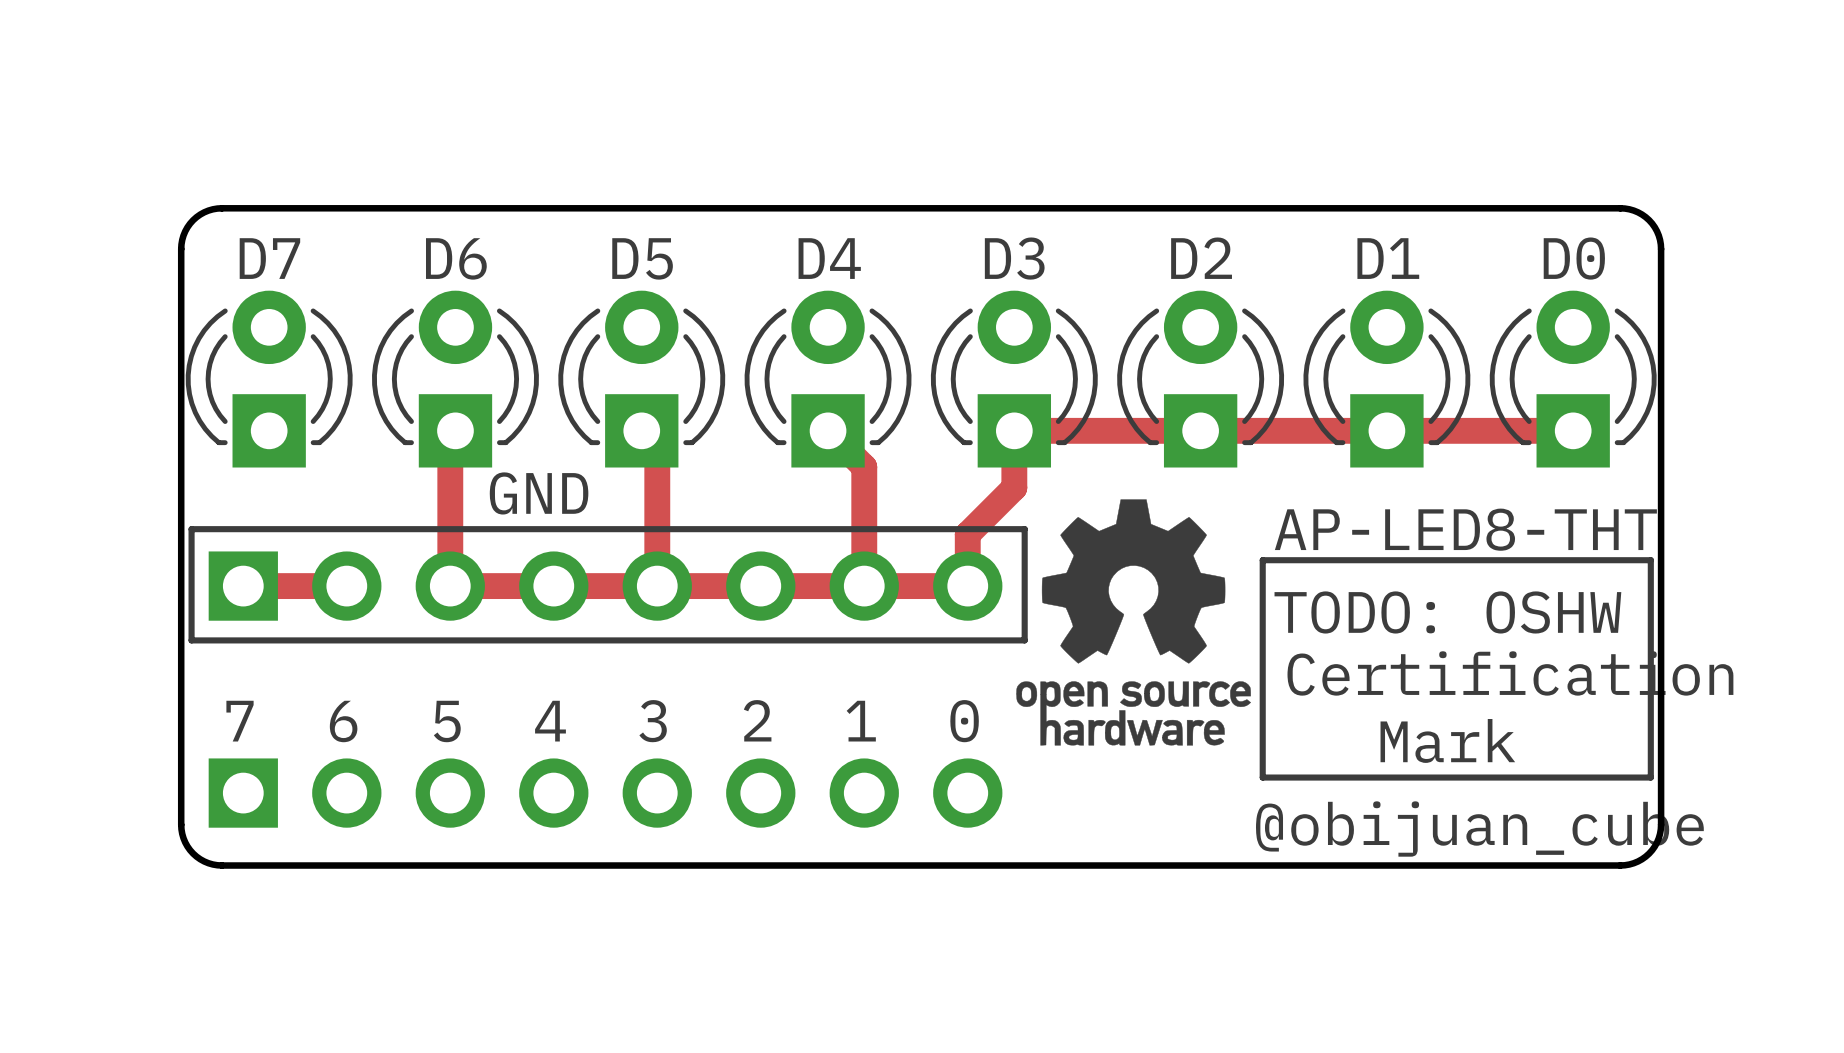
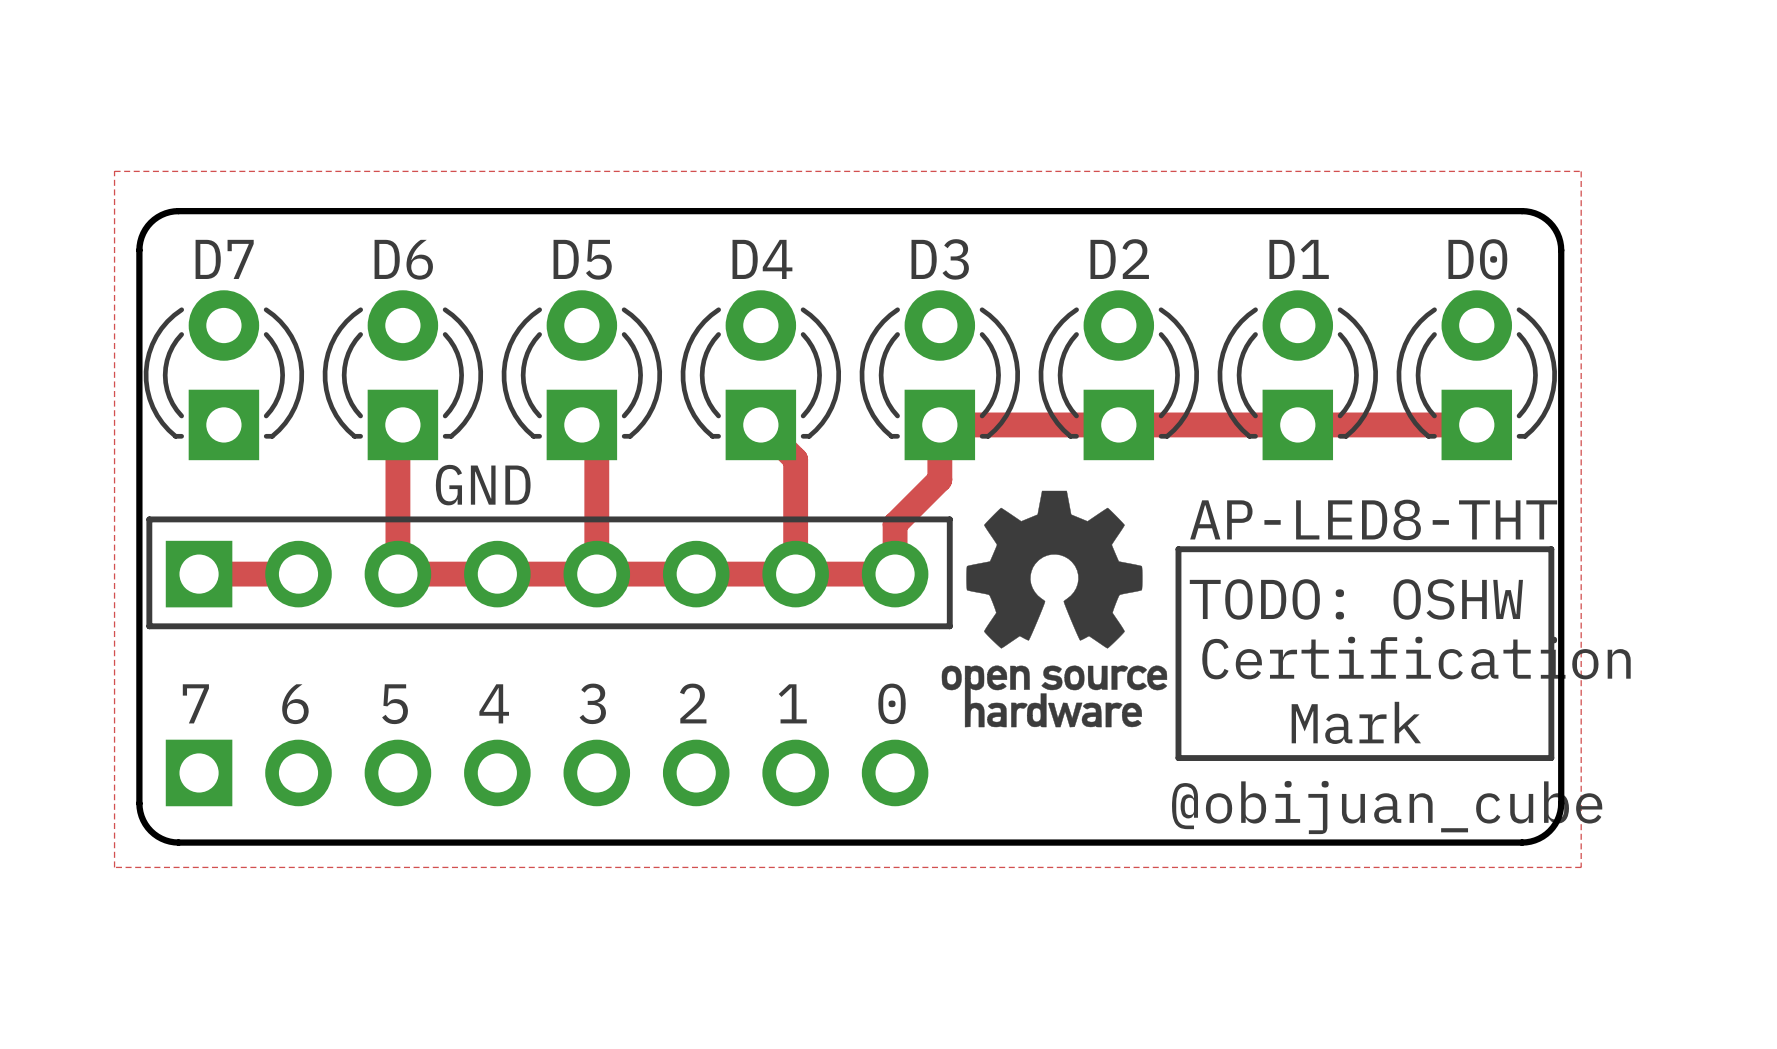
zone outline: none -> (114, 171) (1581, 171) (1581, 867) (114, 867) (114, 171)

